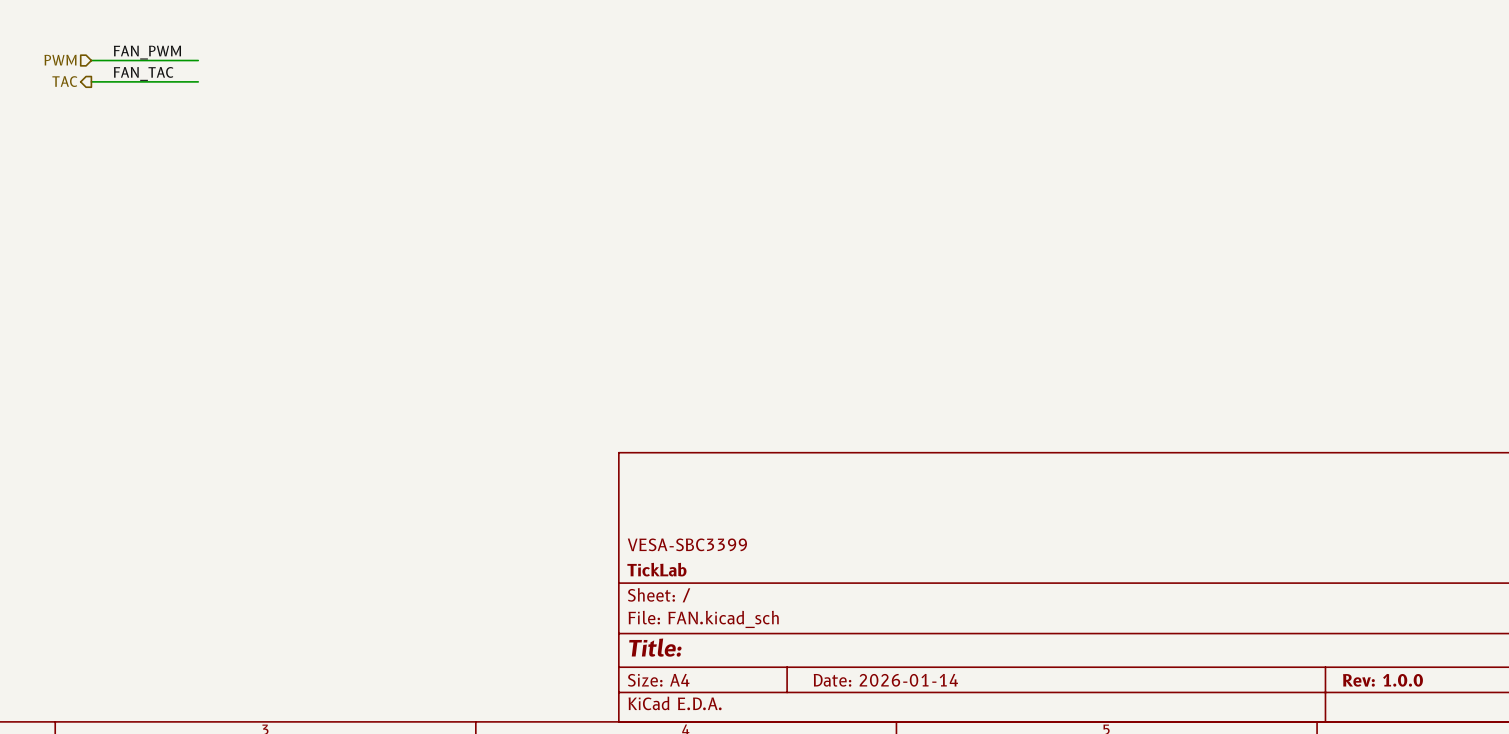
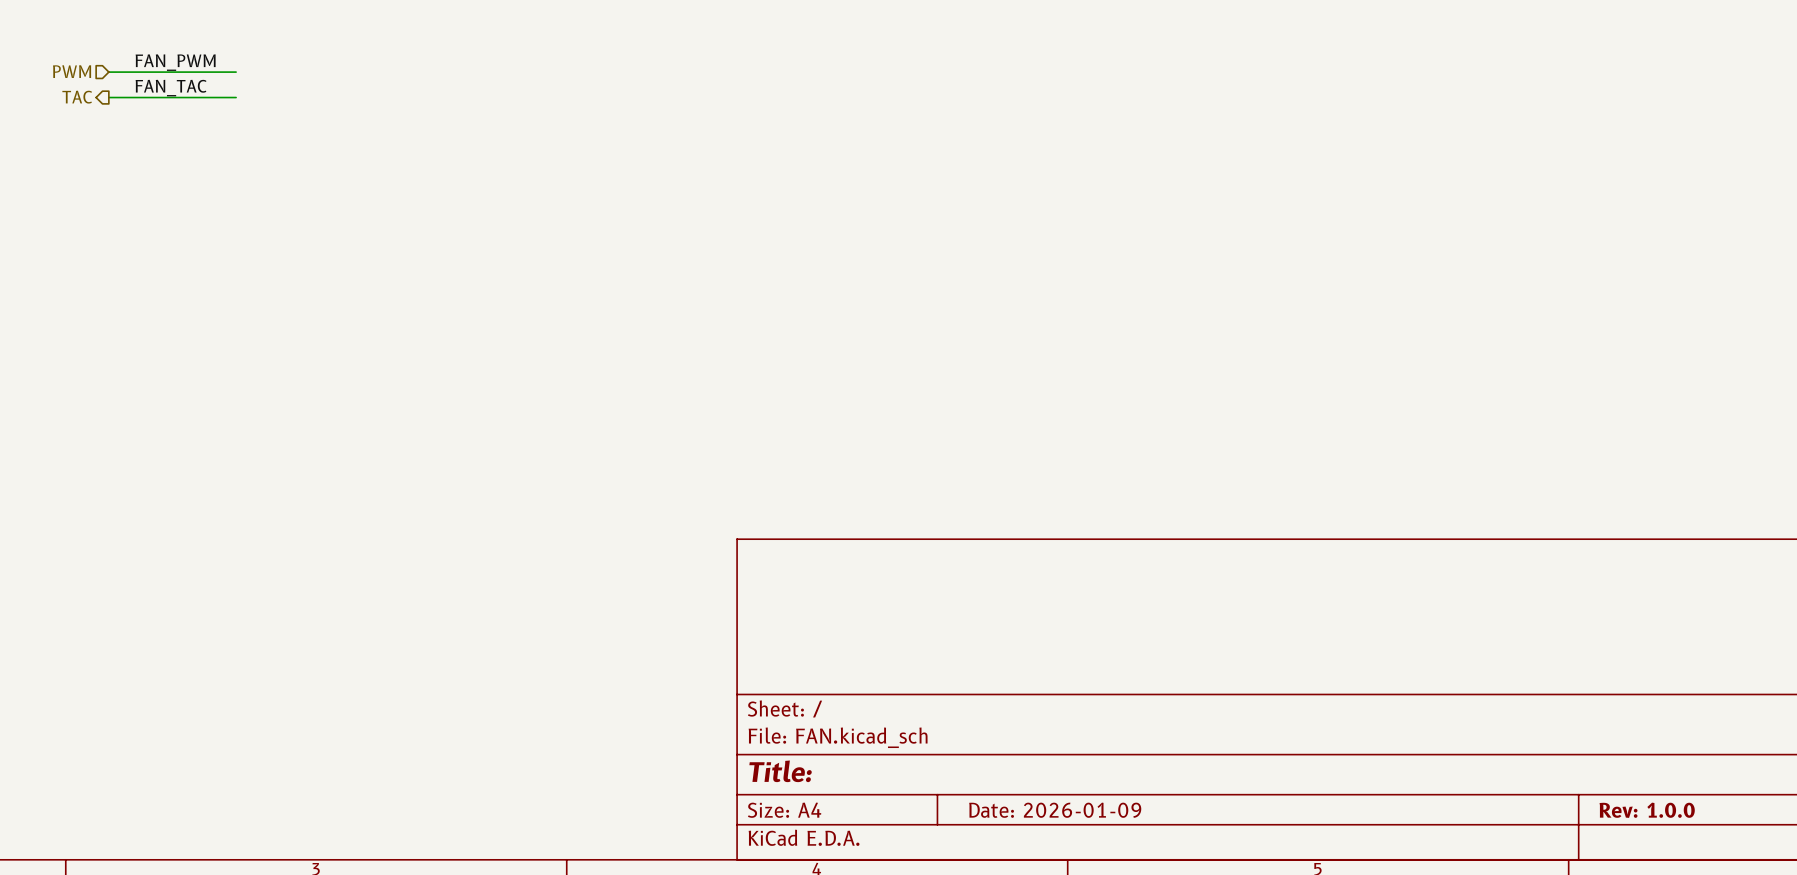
title block: VESA-SBC3399 (687, 544) -> none
title block: TickLab (656, 569) -> none
title block: Date: 2026-01-14 (885, 680) -> Date: 2026-01-09 (1055, 810)

